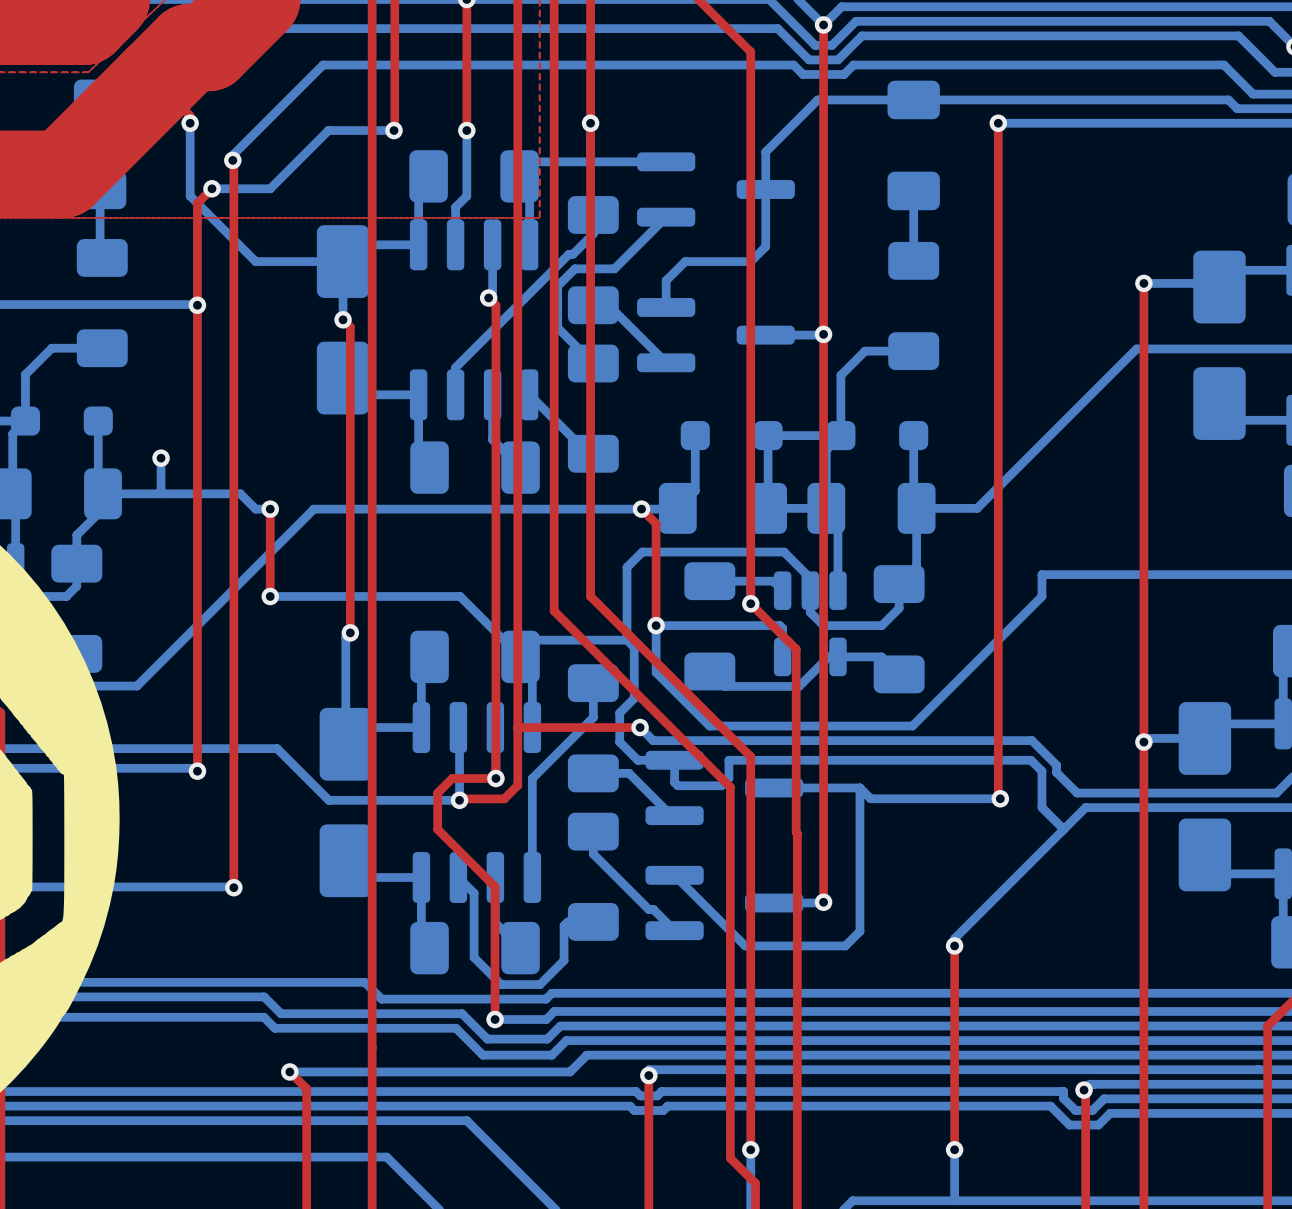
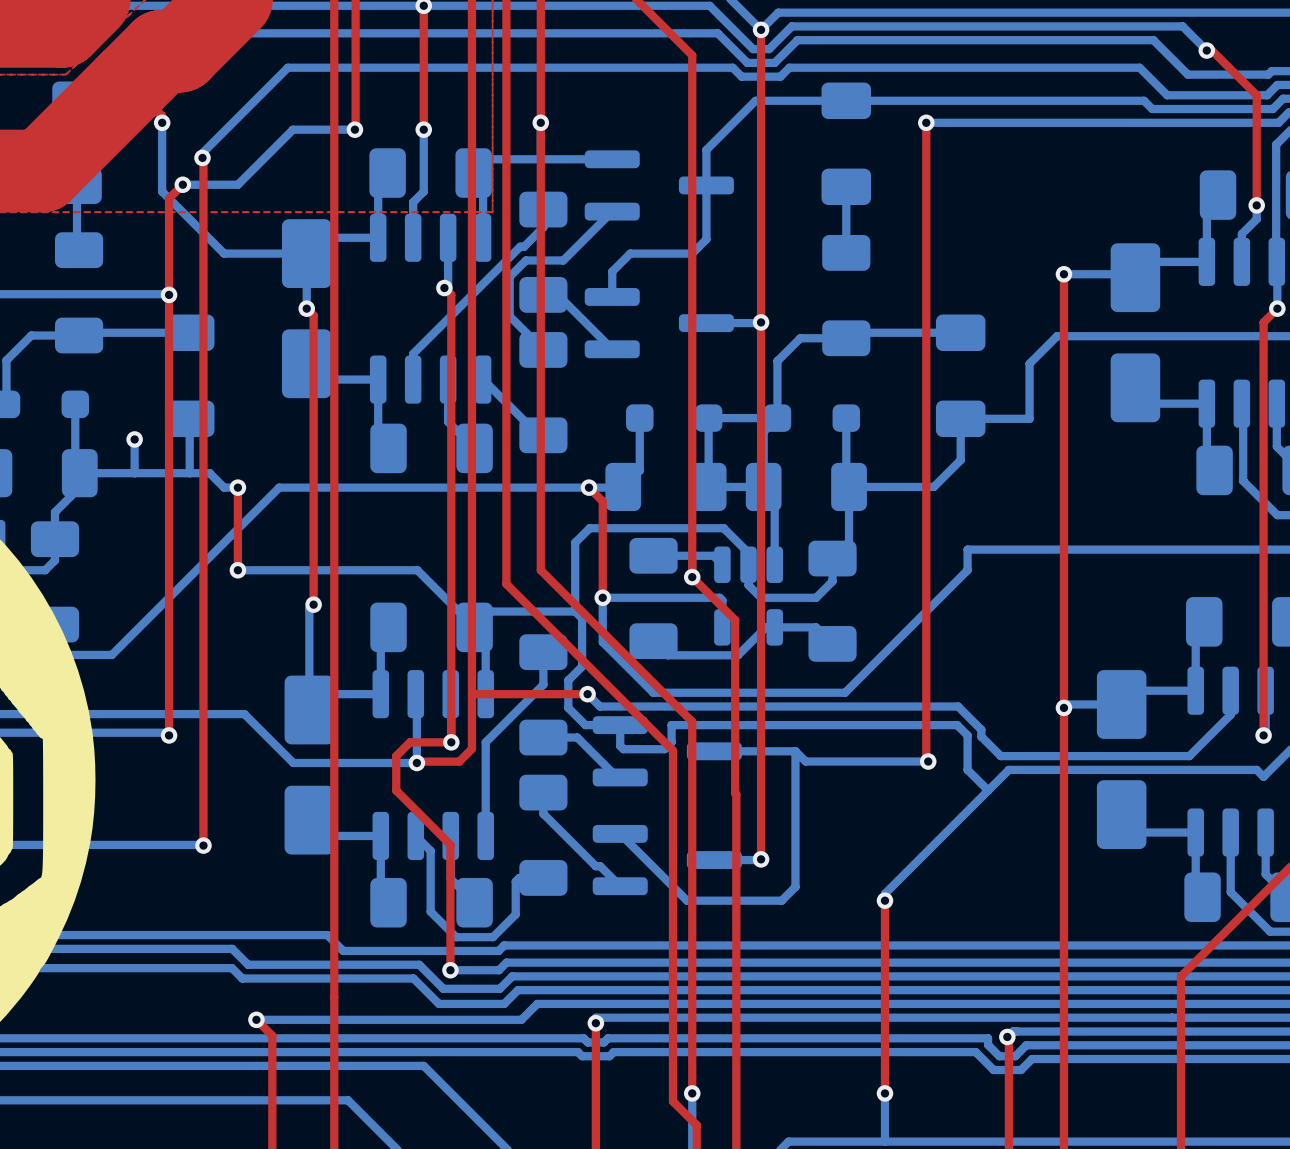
bottom track: none -> (189, 332) (81, 332) (79, 335)
bottom track: none -> (960, 332) (851, 332) (846, 338)
bottom track: (1107, 378) (977, 508) -> (1029, 363) (1029, 418) (960, 418) (960, 460) (933, 486) (906, 486)
part: none -> (189, 375)
part: none -> (960, 375)
bottom track: none -> (189, 418) (189, 473)

